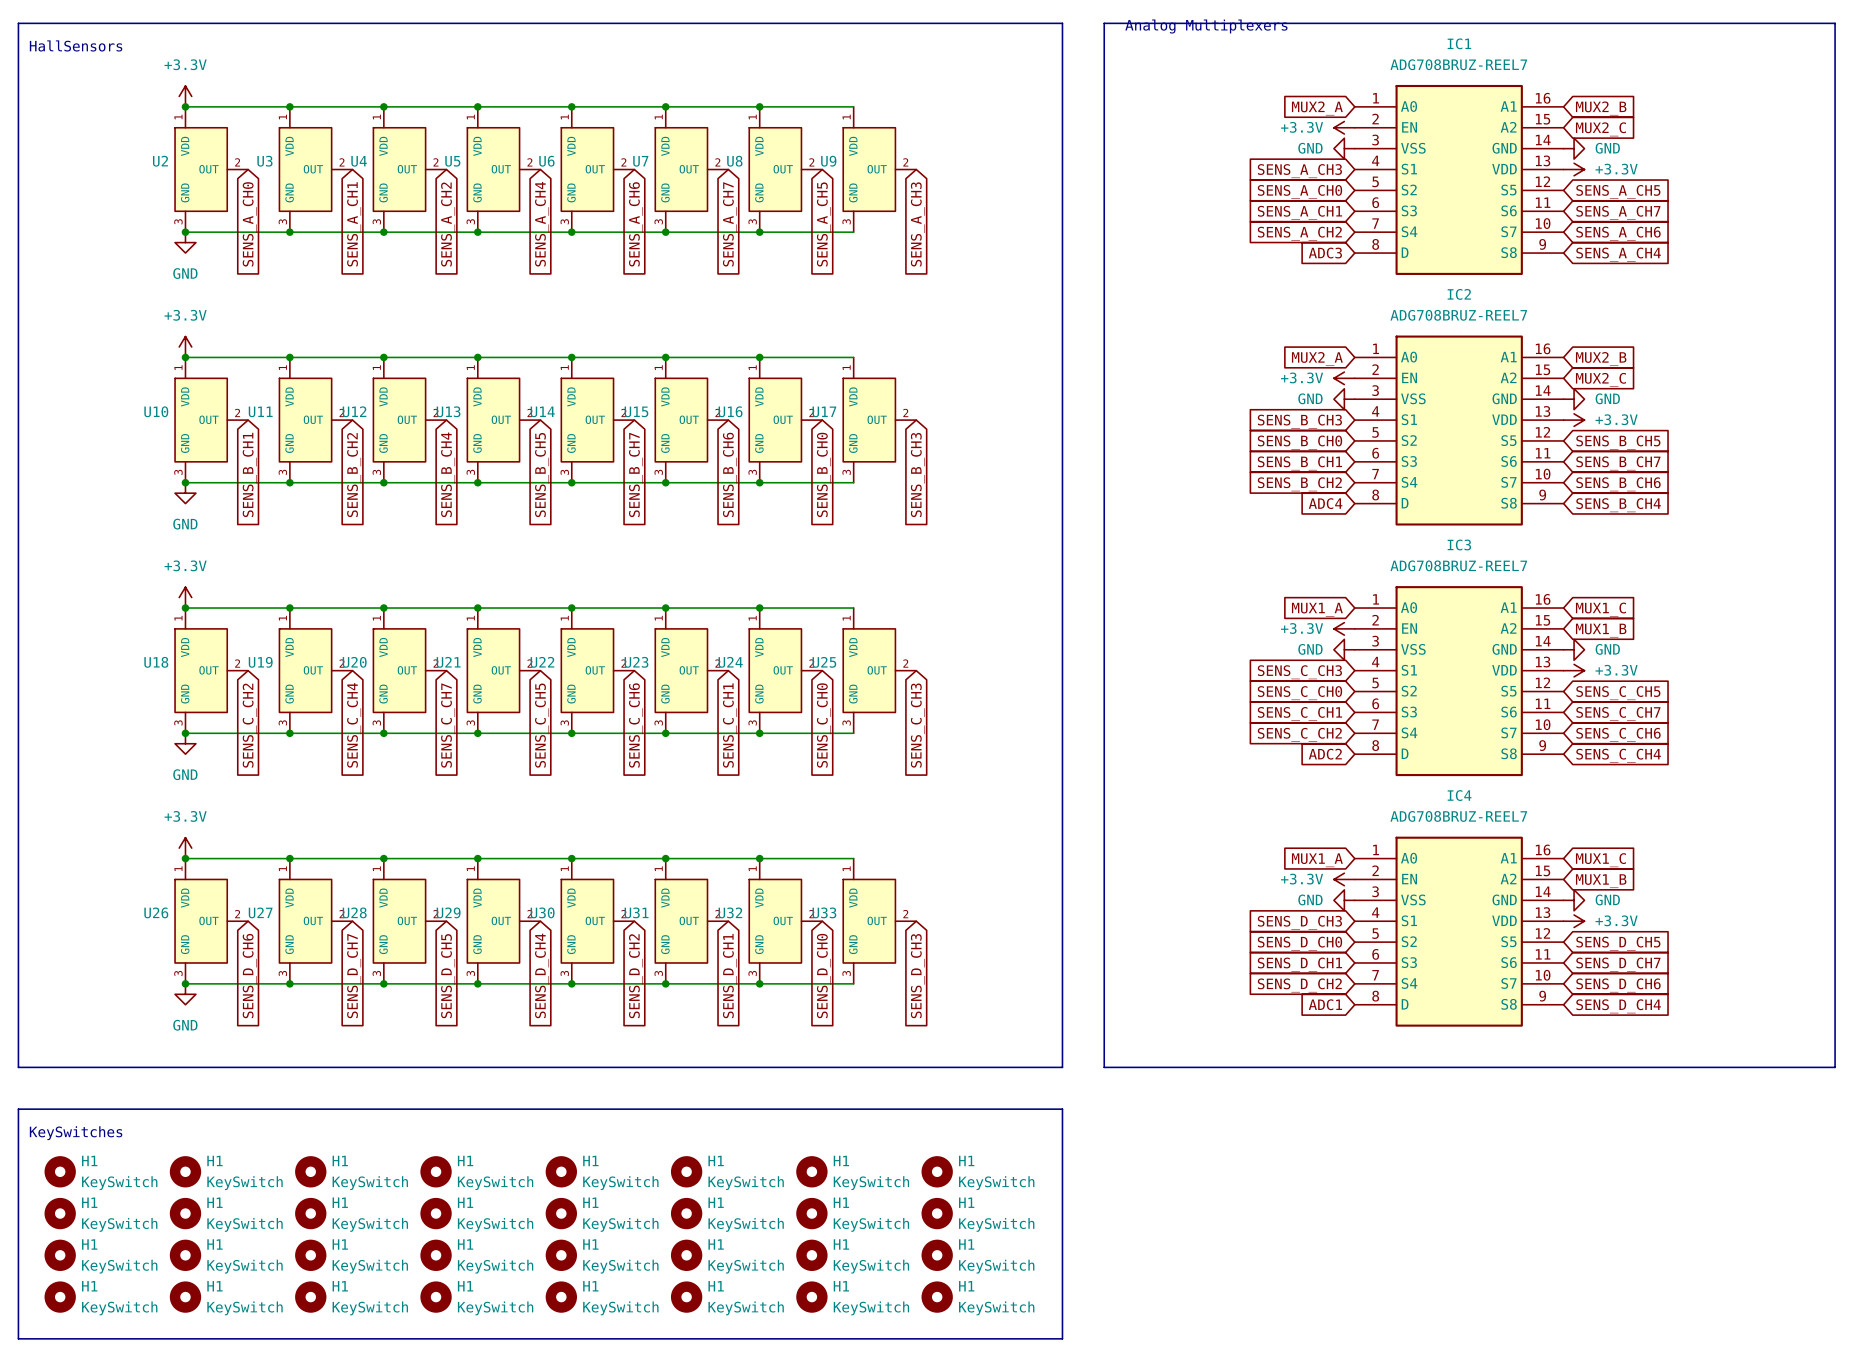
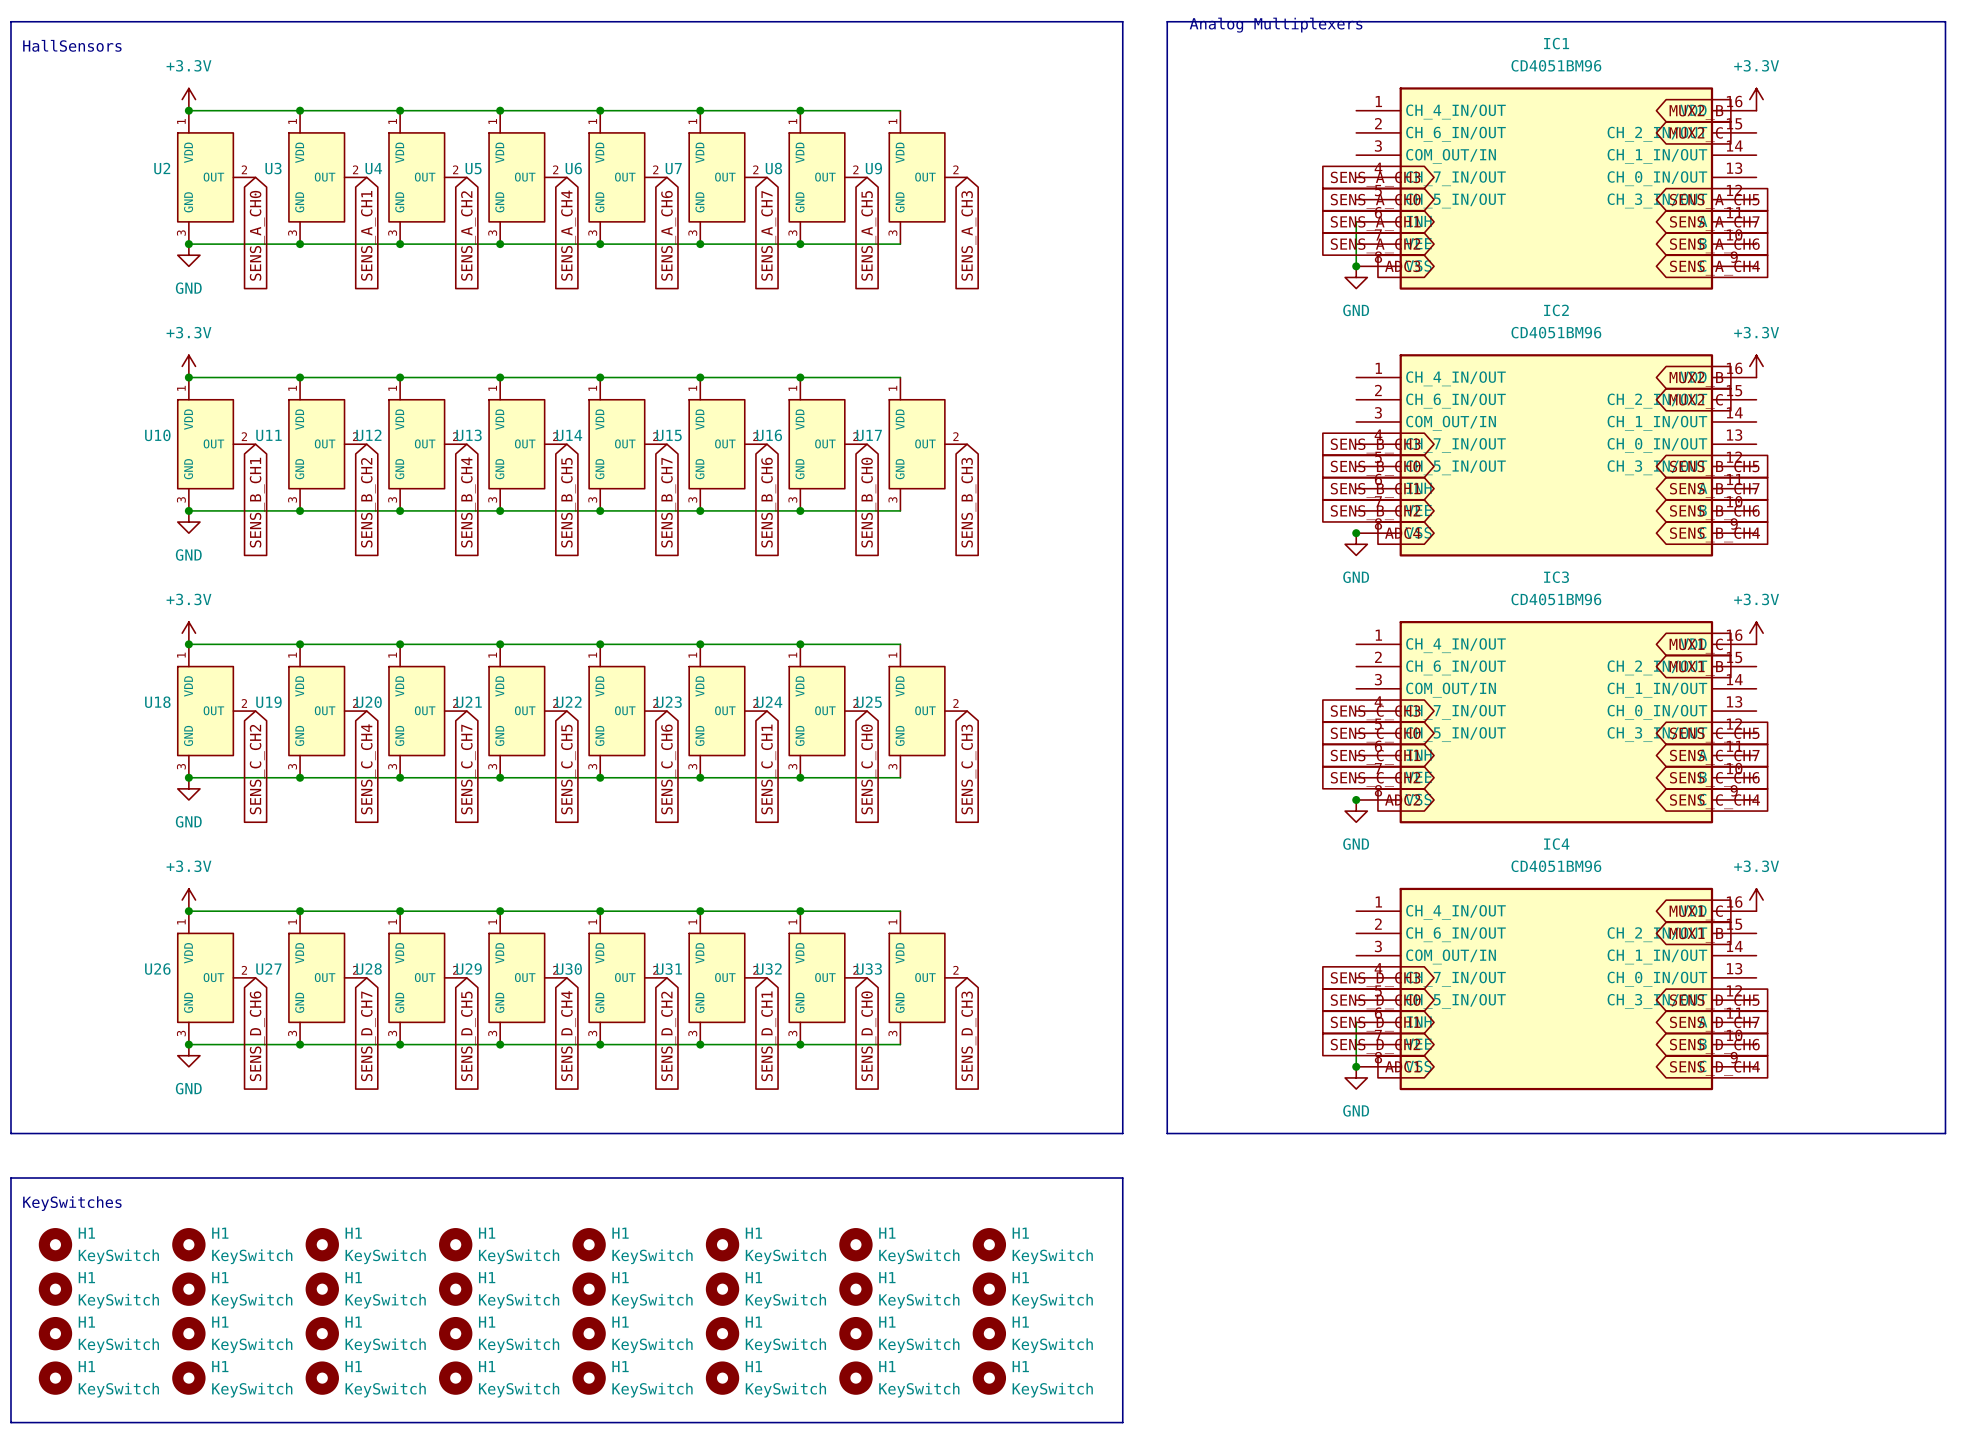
IC1 value: ADG708BRUZ-REEL7 (1458, 64) -> CD4051BM96 (1556, 65)
IC1 symbol: [1354, 84, 1564, 275] -> [1356, 87, 1757, 290]
power symbol: none -> +3.3V (1756, 99)
global label: MUX2_A (1317, 108) -> none
power symbol: +3.3V (1344, 127) -> none
power symbol: GND (1344, 148) -> none
power symbol: GND (1574, 148) -> none
power symbol: +3.3V (1574, 169) -> none
wire: none -> (1356, 221) (1356, 266)
junction: none -> (1356, 266)
power symbol: none -> GND (1356, 277)
IC2 value: ADG708BRUZ-REEL7 (1458, 315) -> CD4051BM96 (1556, 332)
IC2 symbol: [1354, 335, 1564, 526] -> [1356, 354, 1757, 557]
power symbol: none -> +3.3V (1756, 366)
global label: MUX2_A (1317, 359) -> none
power symbol: +3.3V (1344, 378) -> none
power symbol: GND (1344, 399) -> none
power symbol: GND (1574, 399) -> none
power symbol: +3.3V (1574, 420) -> none
junction: none -> (1356, 533)
power symbol: none -> GND (1356, 544)
IC3 value: ADG708BRUZ-REEL7 (1458, 565) -> CD4051BM96 (1556, 599)
IC3 symbol: [1354, 586, 1564, 777] -> [1356, 621, 1757, 824]
power symbol: none -> +3.3V (1756, 633)
global label: MUX1_A (1317, 609) -> none
power symbol: +3.3V (1344, 628) -> none
power symbol: GND (1344, 649) -> none
power symbol: GND (1574, 649) -> none
power symbol: +3.3V (1574, 670) -> none
junction: none -> (1356, 799)
power symbol: none -> GND (1356, 811)
IC4 value: ADG708BRUZ-REEL7 (1458, 816) -> CD4051BM96 (1556, 866)
IC4 symbol: [1354, 836, 1564, 1027] -> [1356, 887, 1757, 1091]
power symbol: none -> +3.3V (1756, 900)
global label: MUX1_A (1317, 860) -> none
power symbol: +3.3V (1344, 879) -> none
power symbol: GND (1344, 900) -> none
power symbol: GND (1574, 900) -> none
power symbol: +3.3V (1574, 921) -> none
wire: none -> (1356, 1022) (1356, 1066)
junction: none -> (1356, 1066)
power symbol: none -> GND (1356, 1077)

